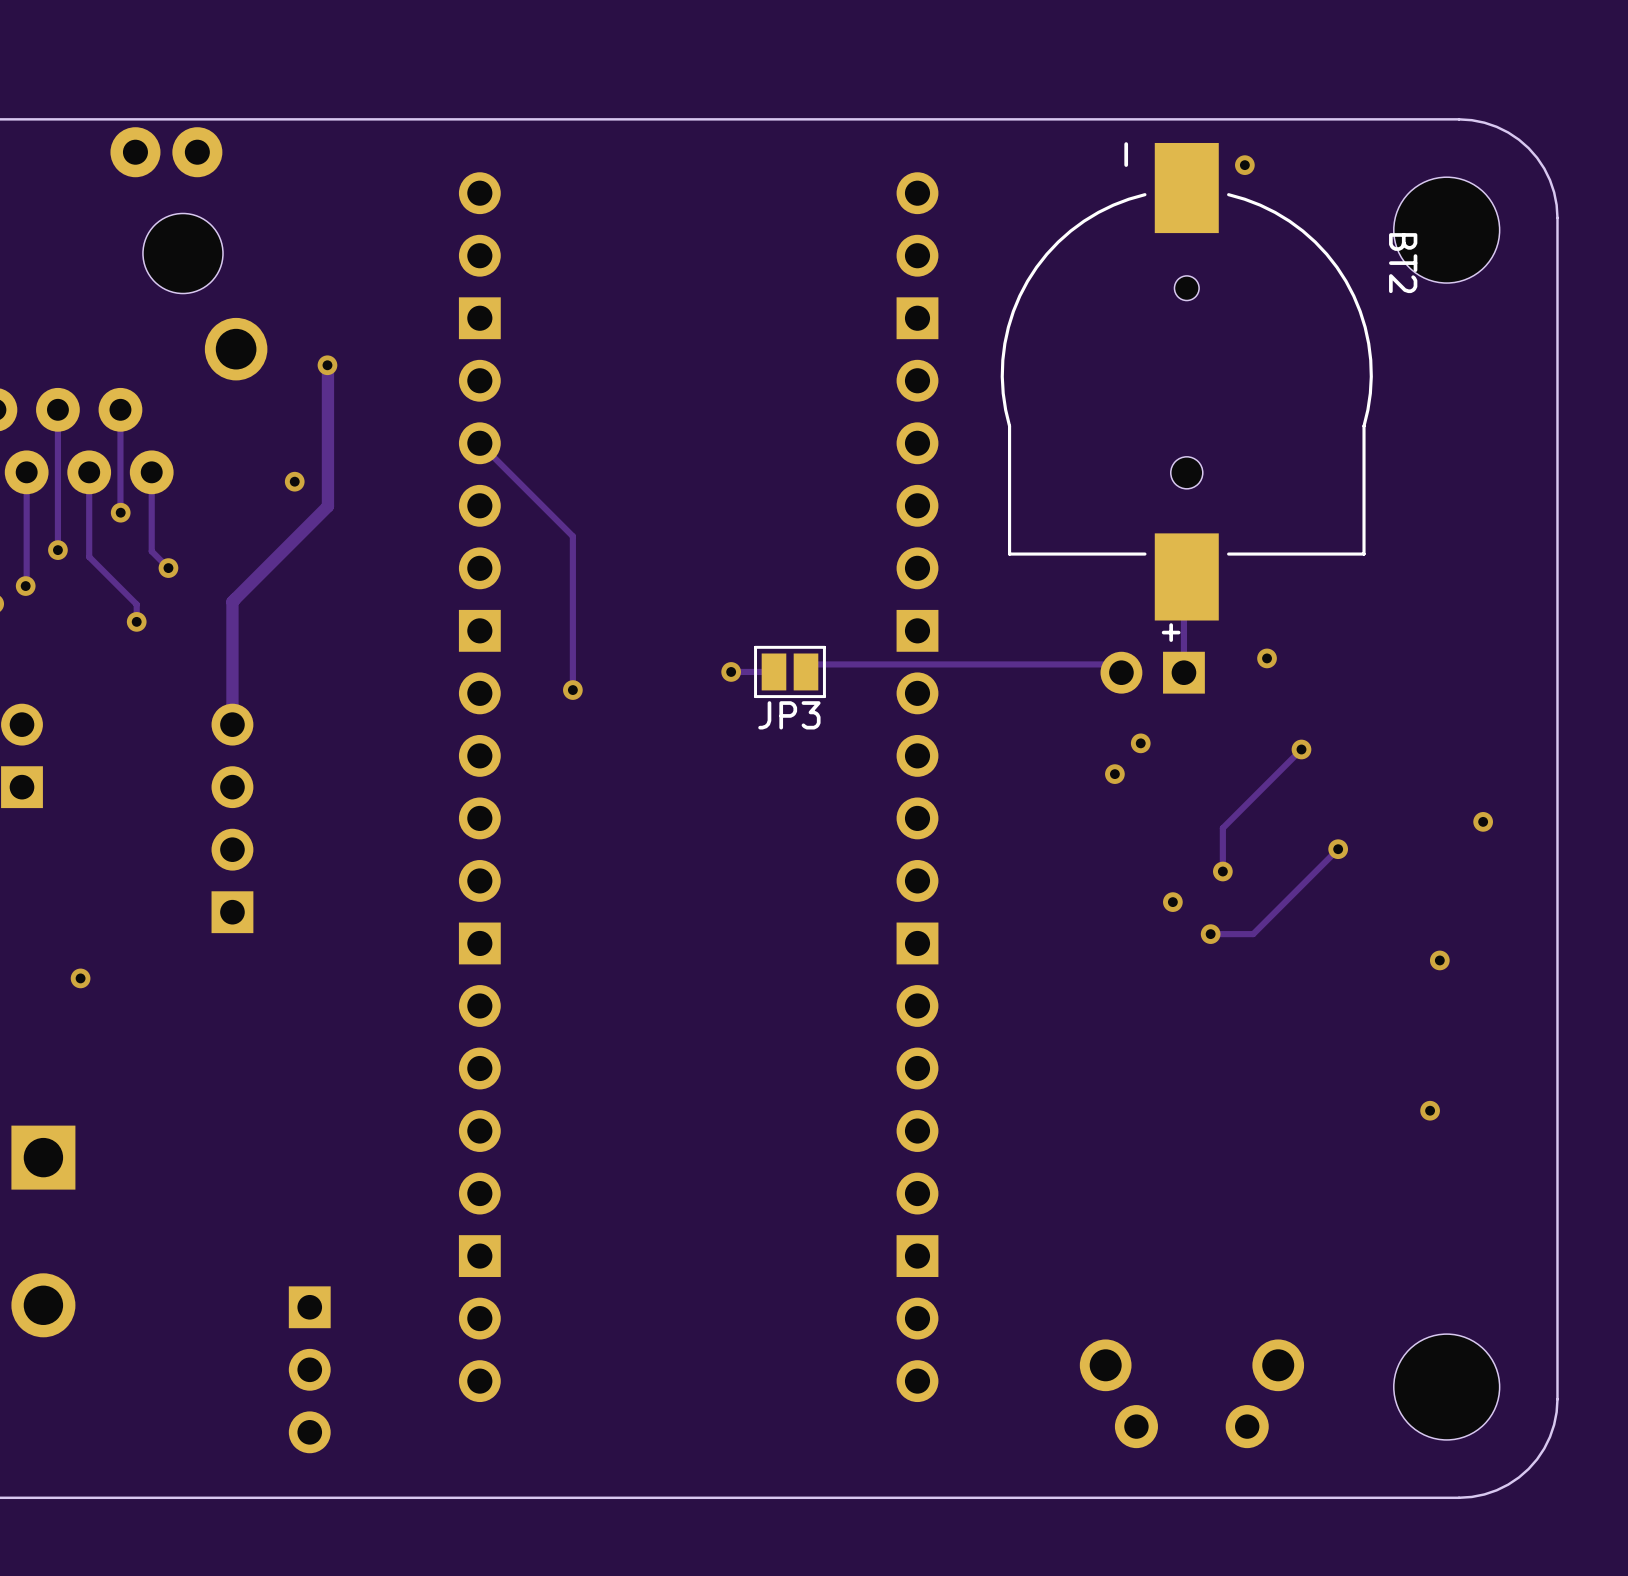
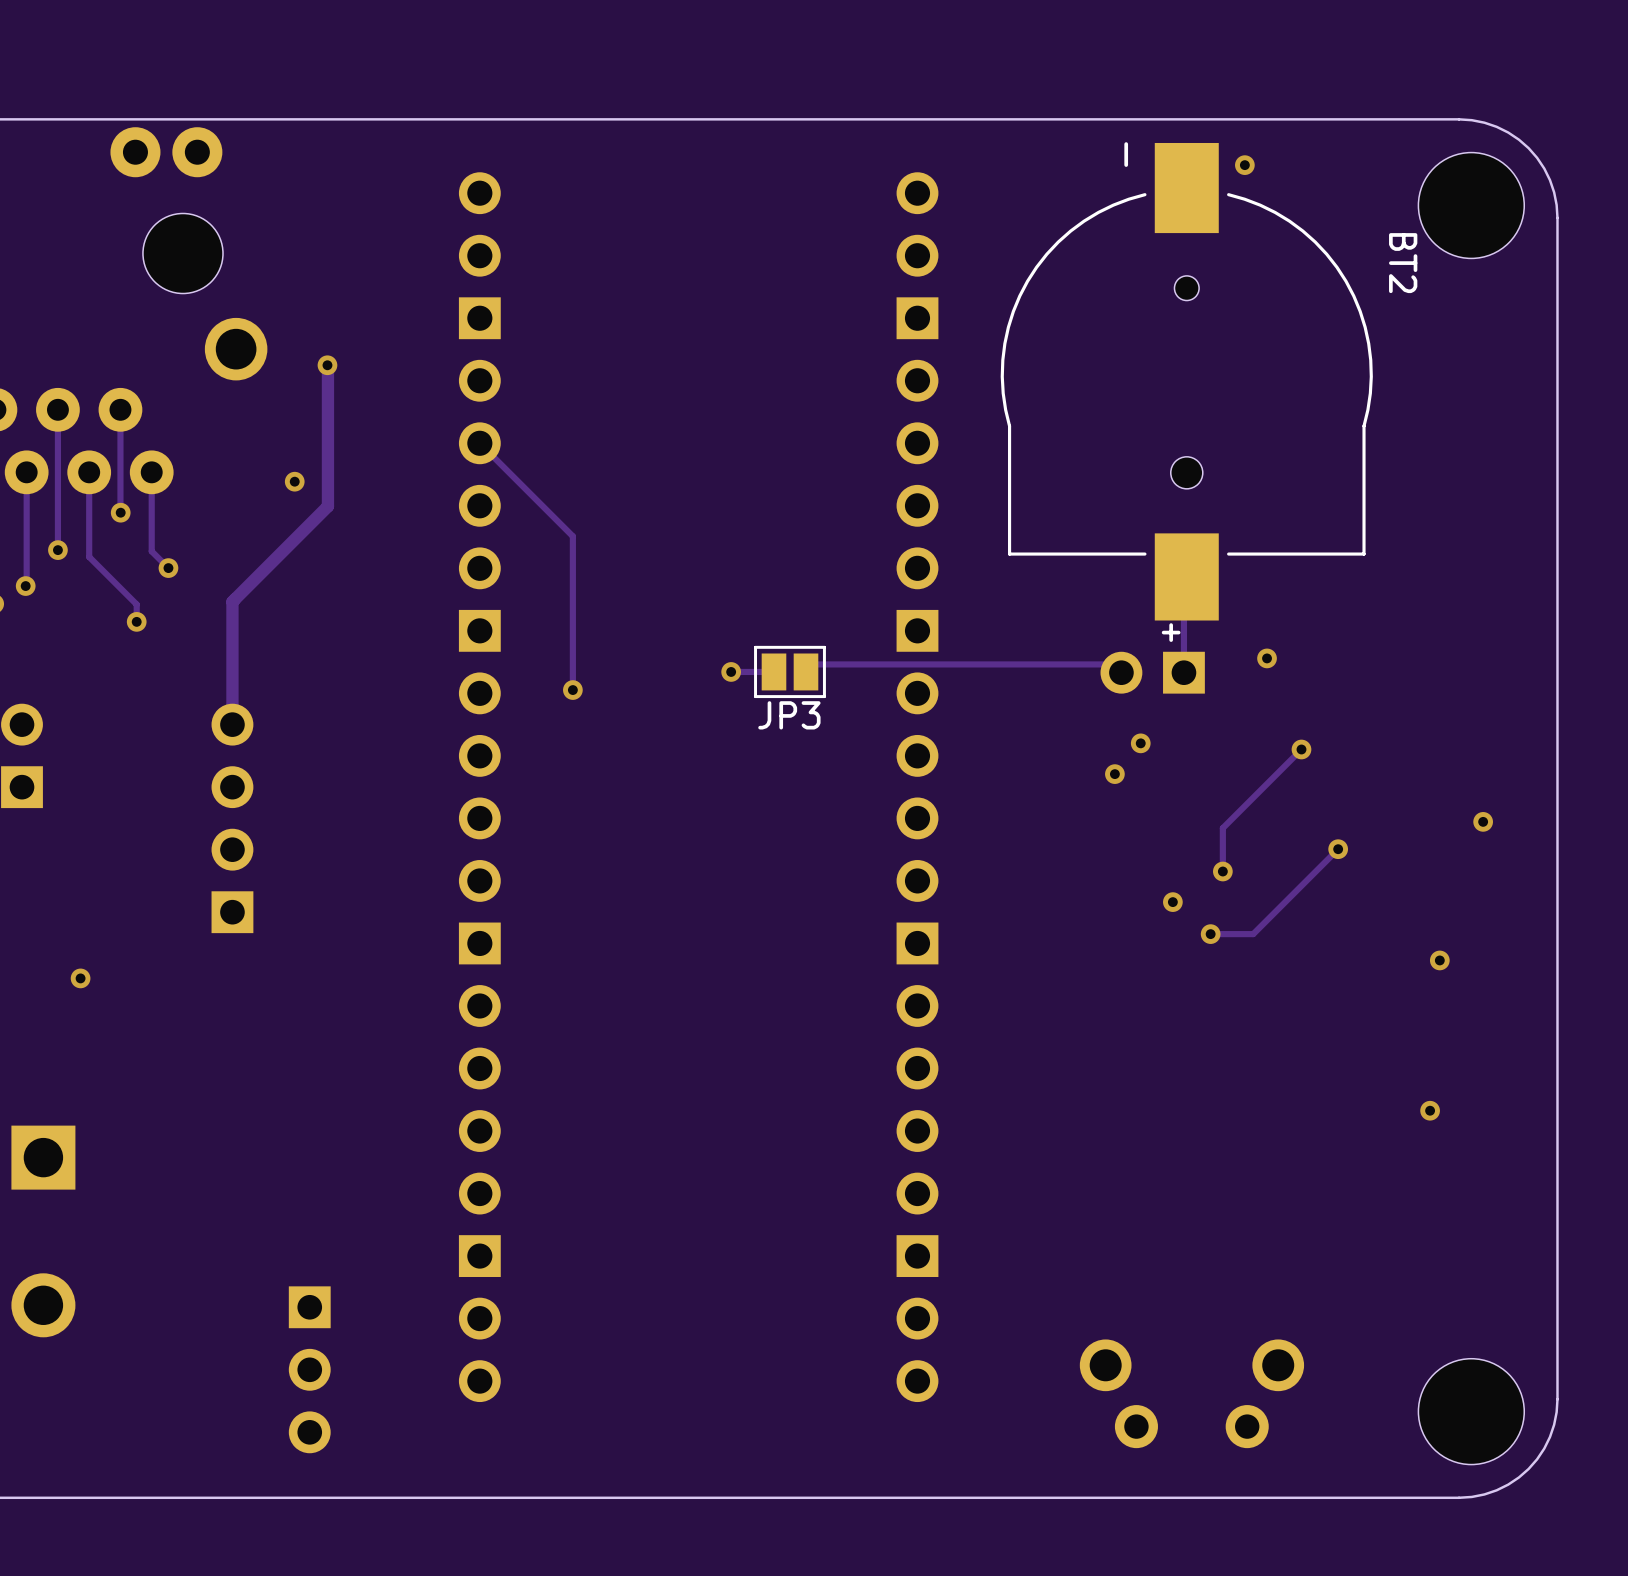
part position: (1446, 230) -> (1471, 205)
part position: (1446, 1387) -> (1471, 1411)

